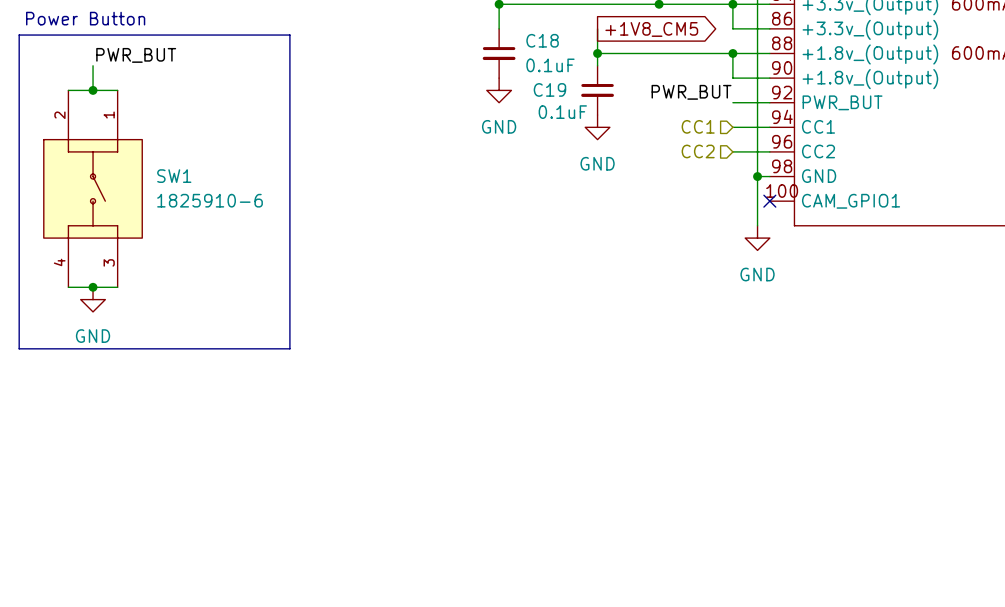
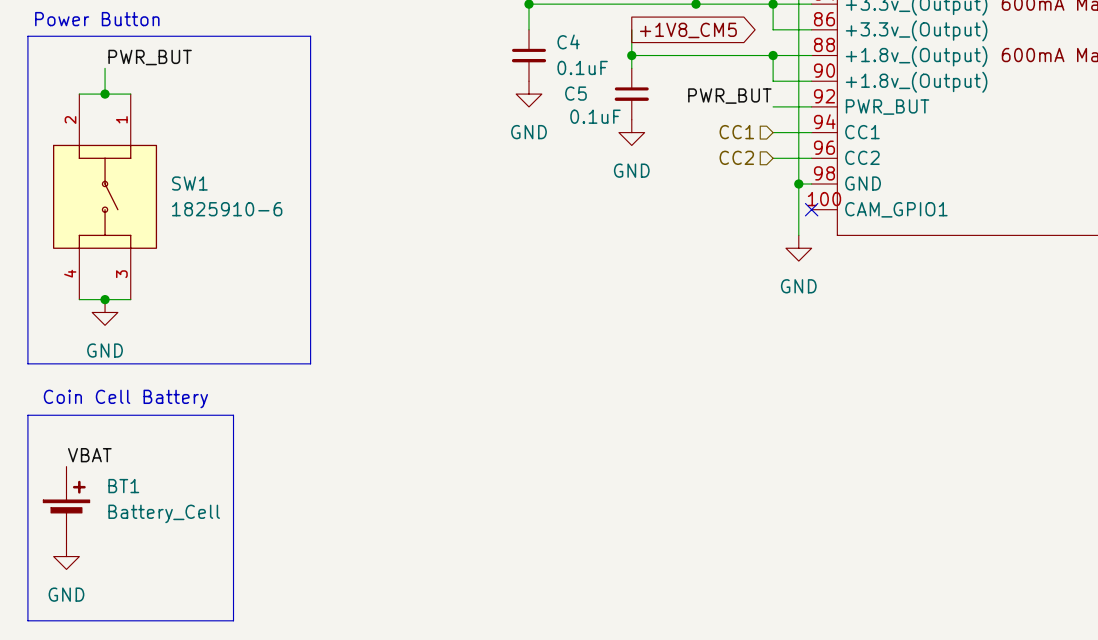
C18 name: C18 (542, 40) -> C4 (568, 41)
C19 name: C19 (549, 89) -> C5 (575, 93)
text: none -> Coin Cell Battery (125, 398)
line: none -> (27, 415) (233, 415) (233, 620) (27, 620) (27, 415)
label: none -> VBAT (89, 455)
BT1: none -> Battery_Cell (66, 505)
power symbol: none -> GND (66, 556)

